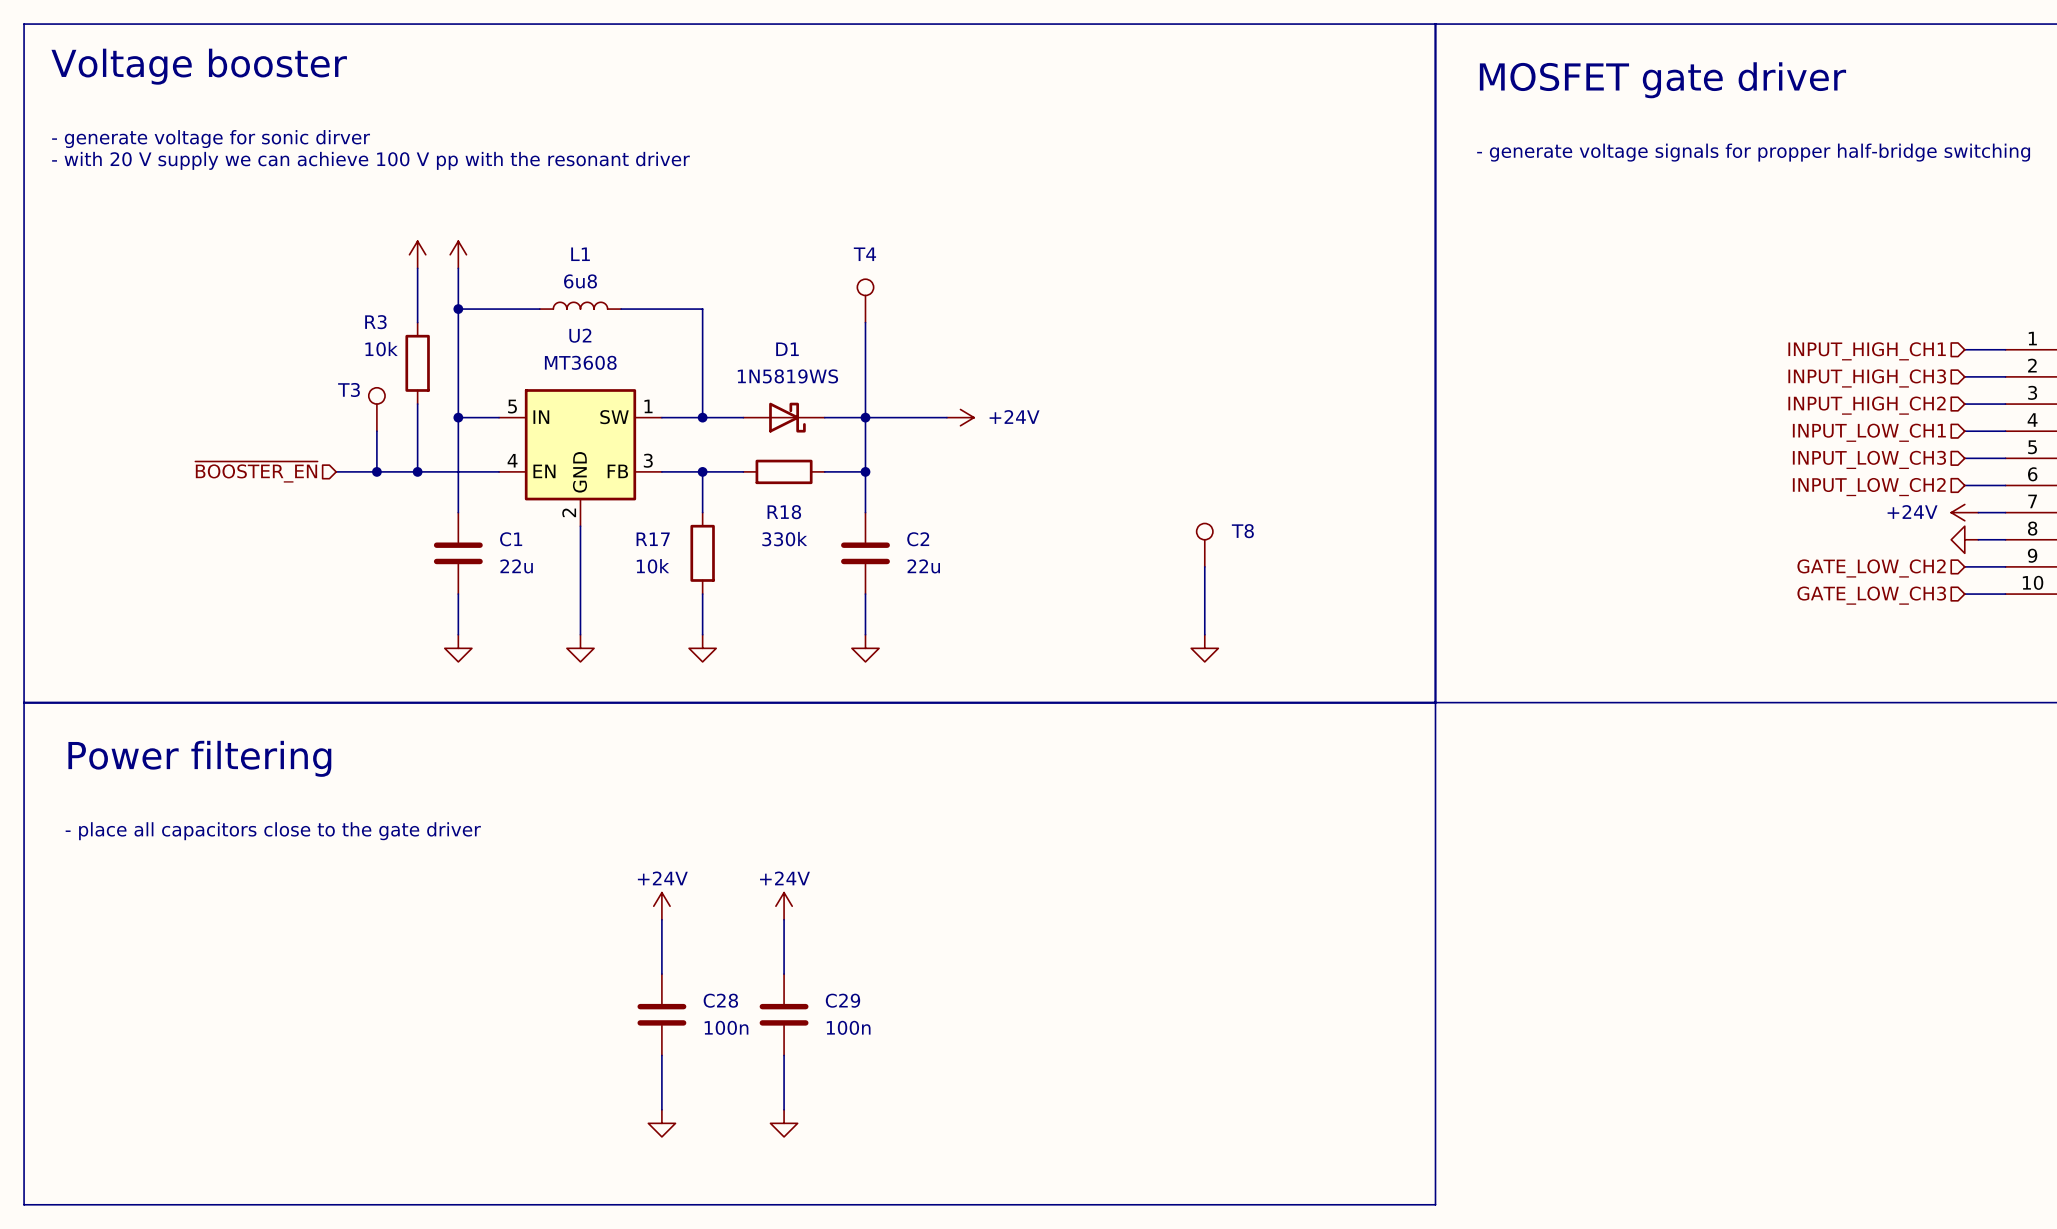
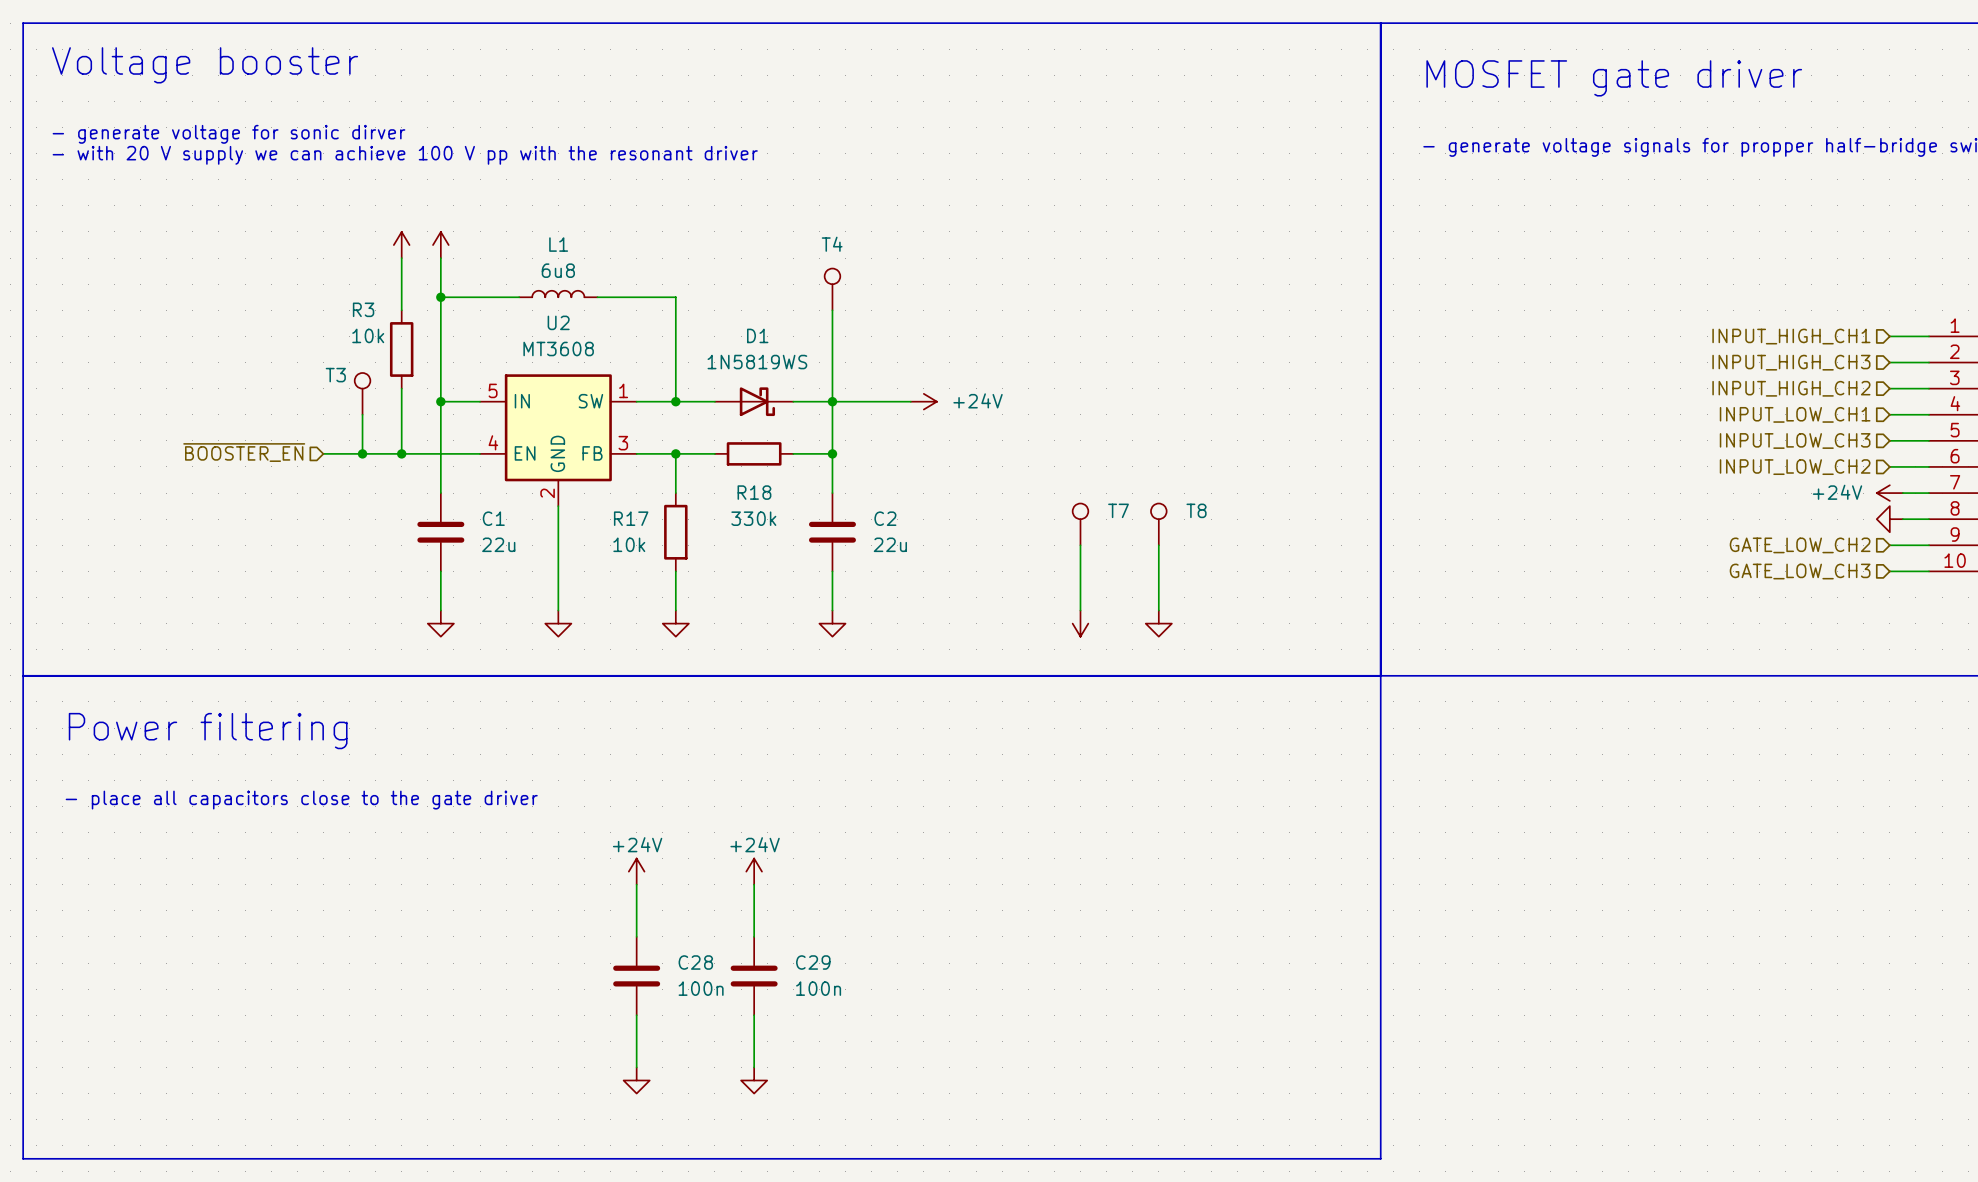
T7: none -> (1080, 524)
wire: none -> (1080, 545) (1080, 610)
power symbol: none -> (1080, 623)

